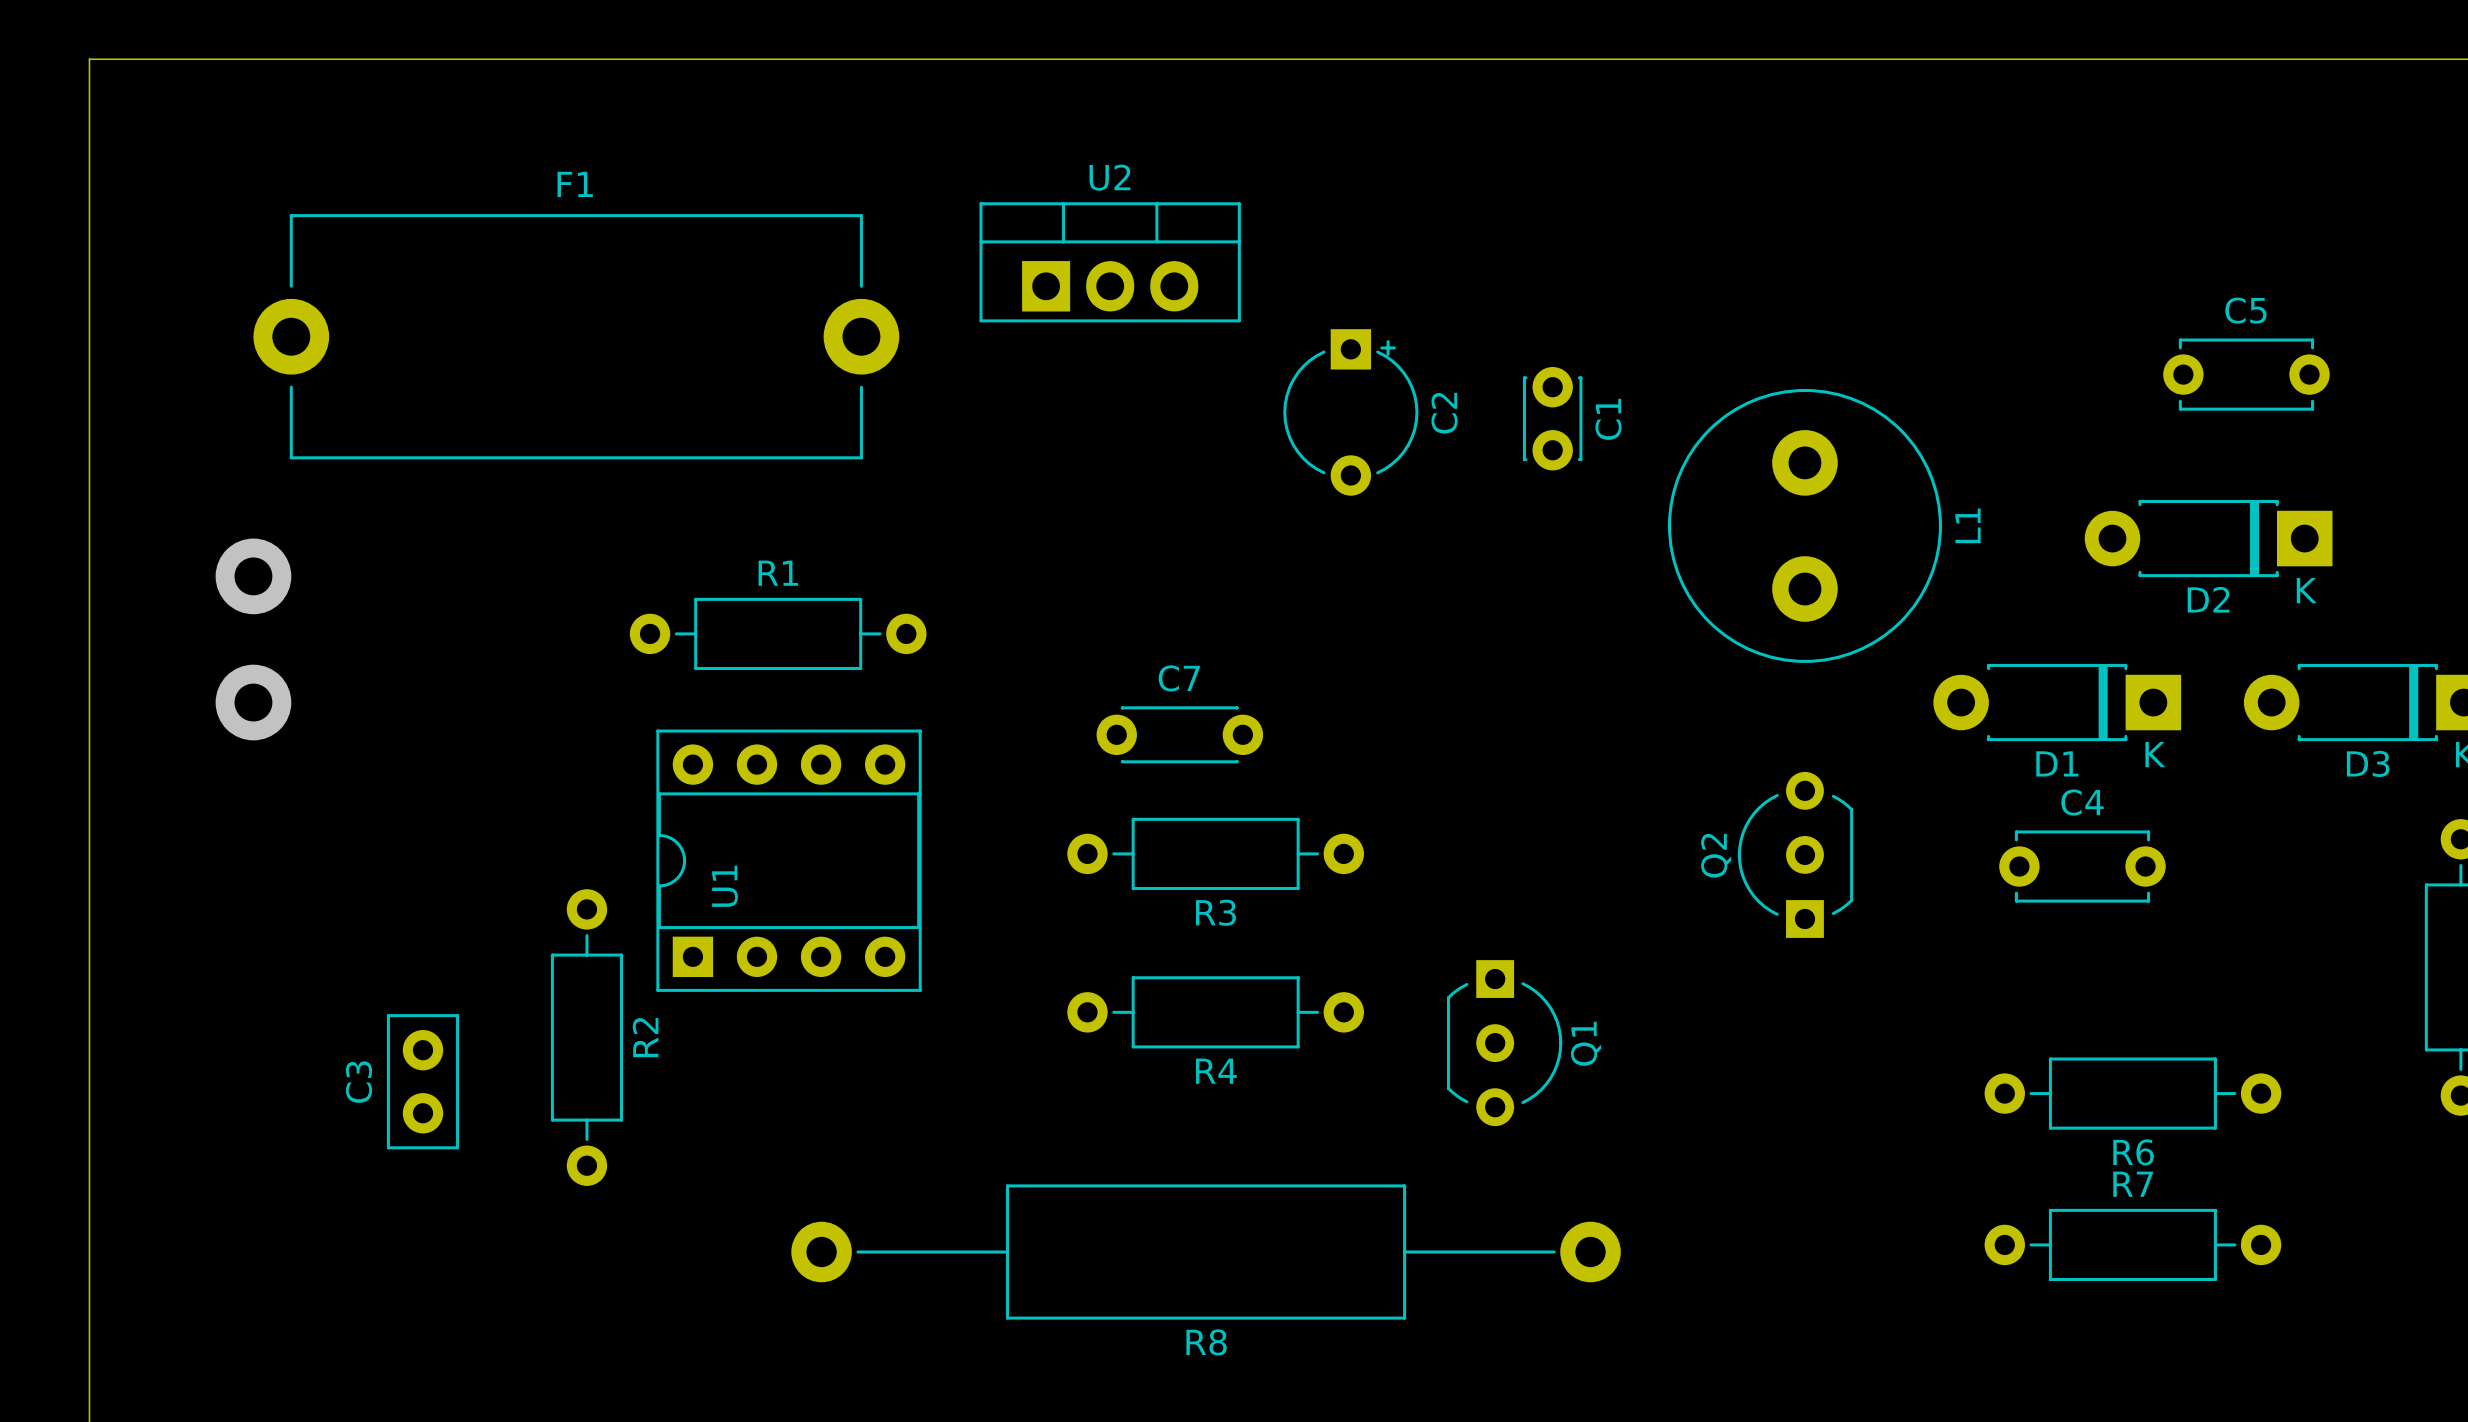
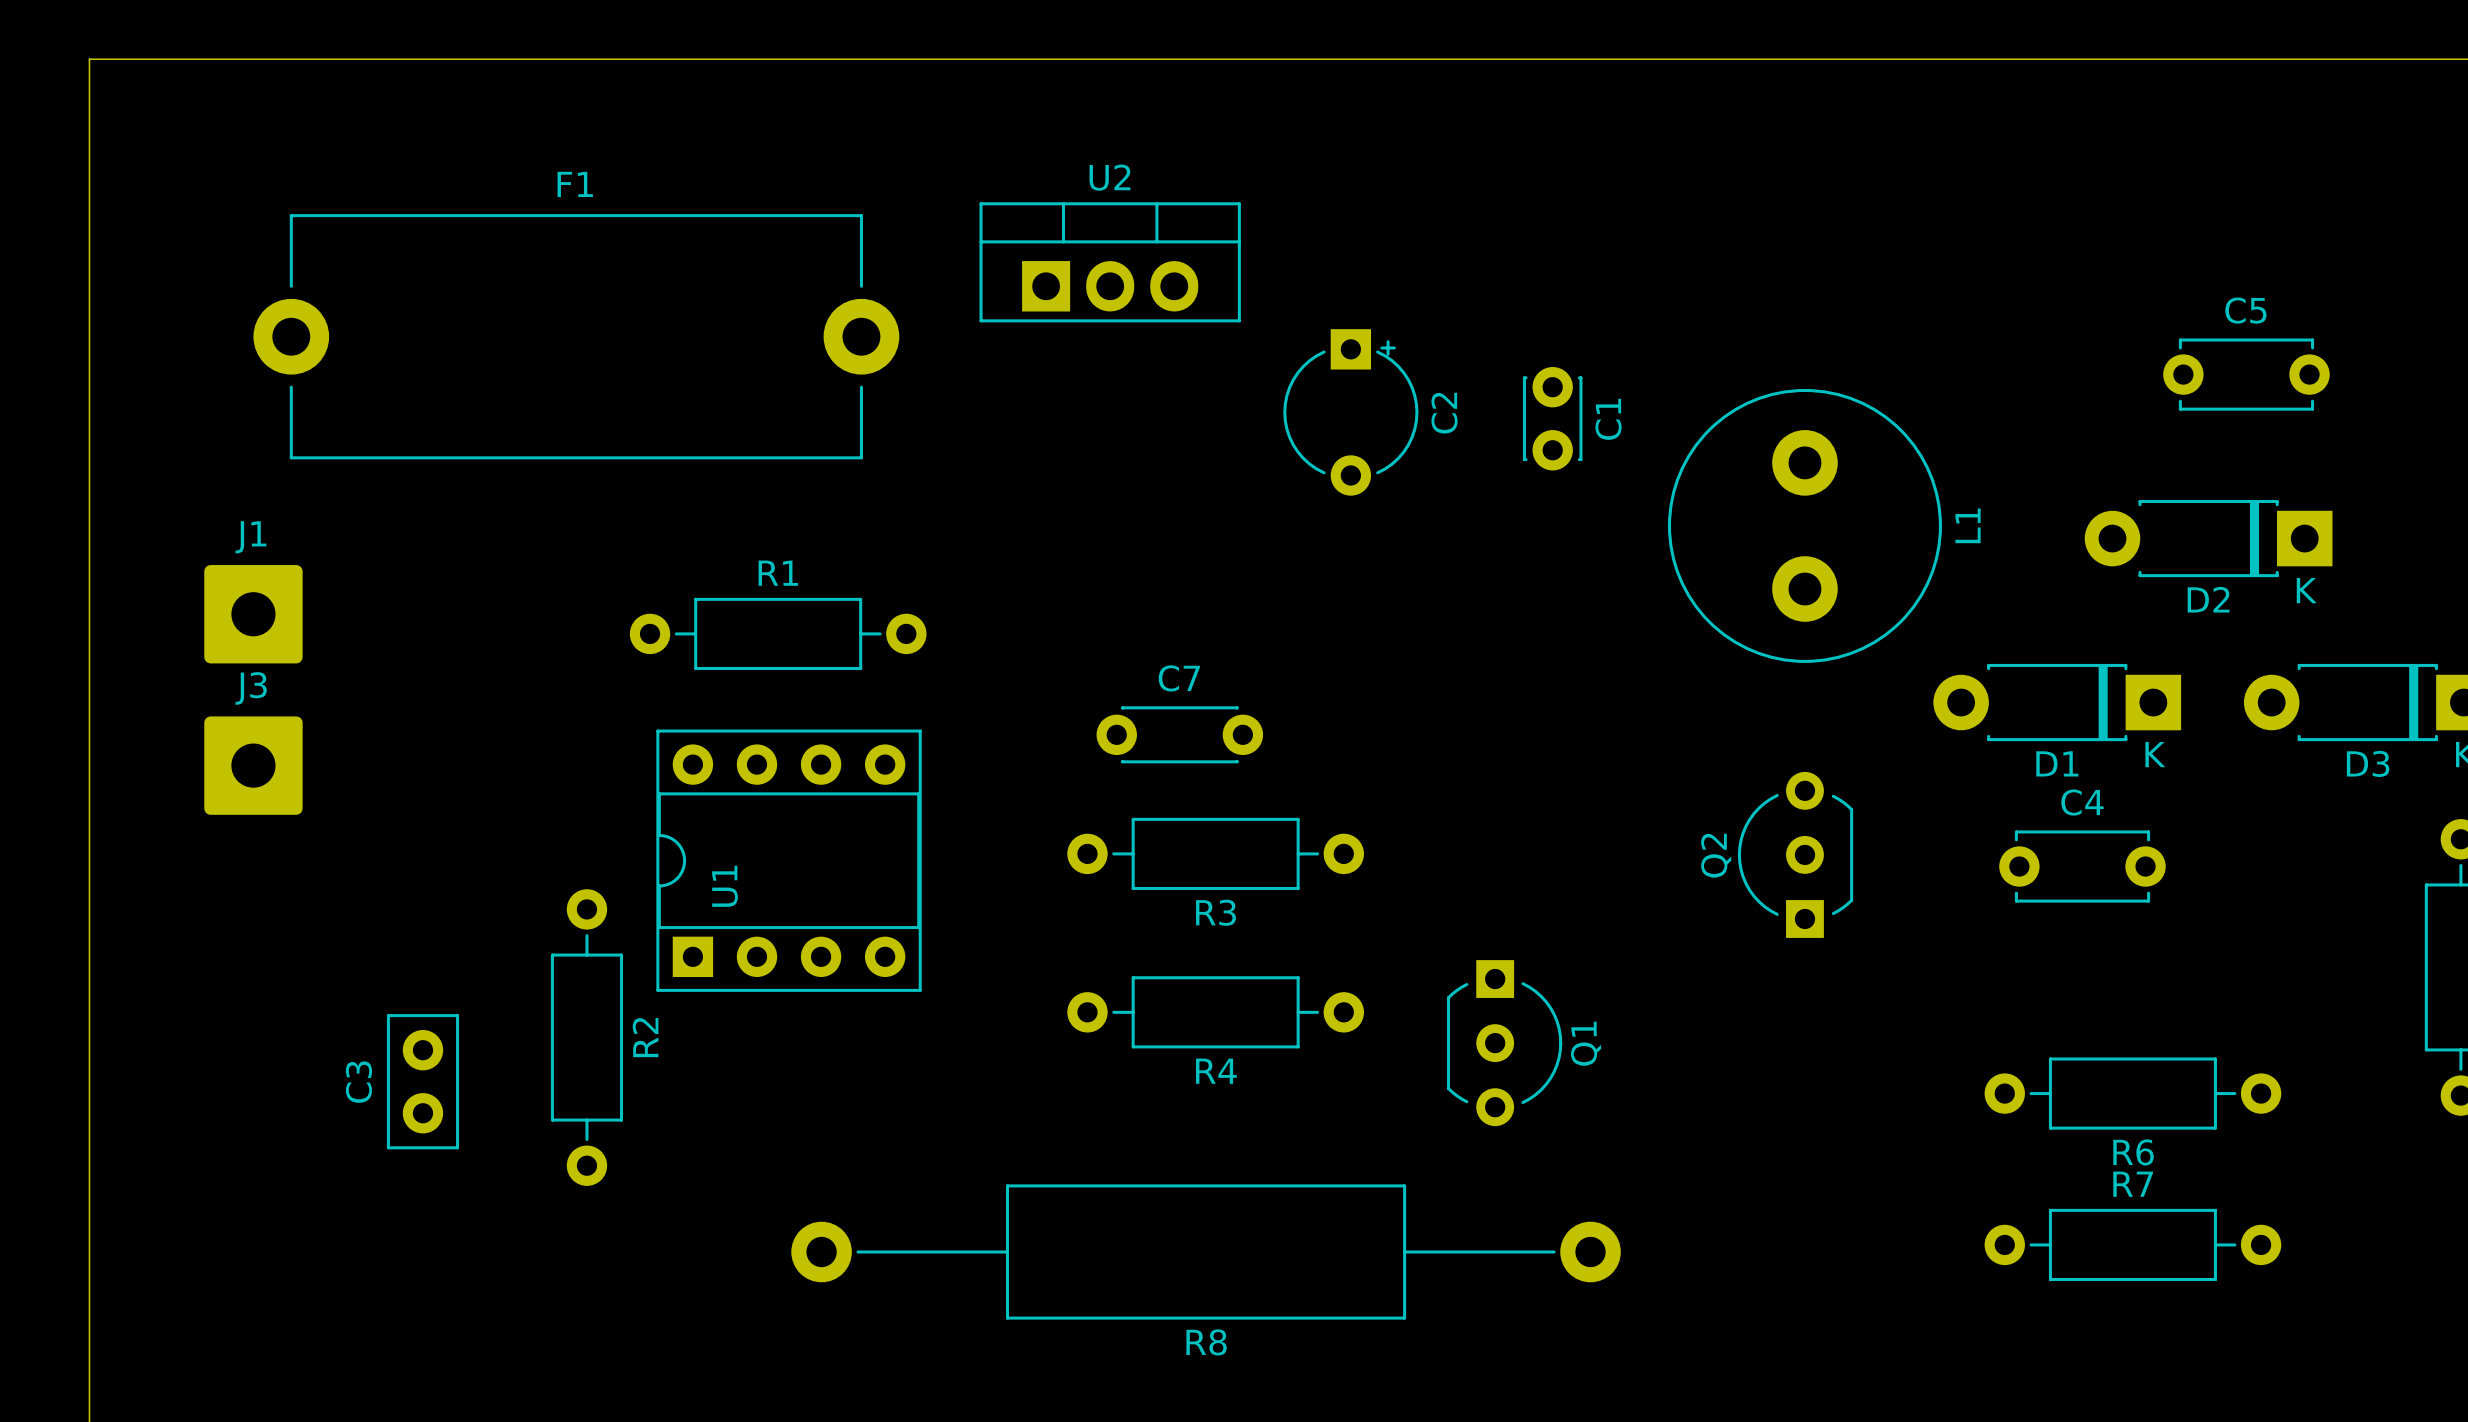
via: (253, 576) -> none
J1: none -> (253, 614)
via: (253, 702) -> none
J3: none -> (253, 765)

